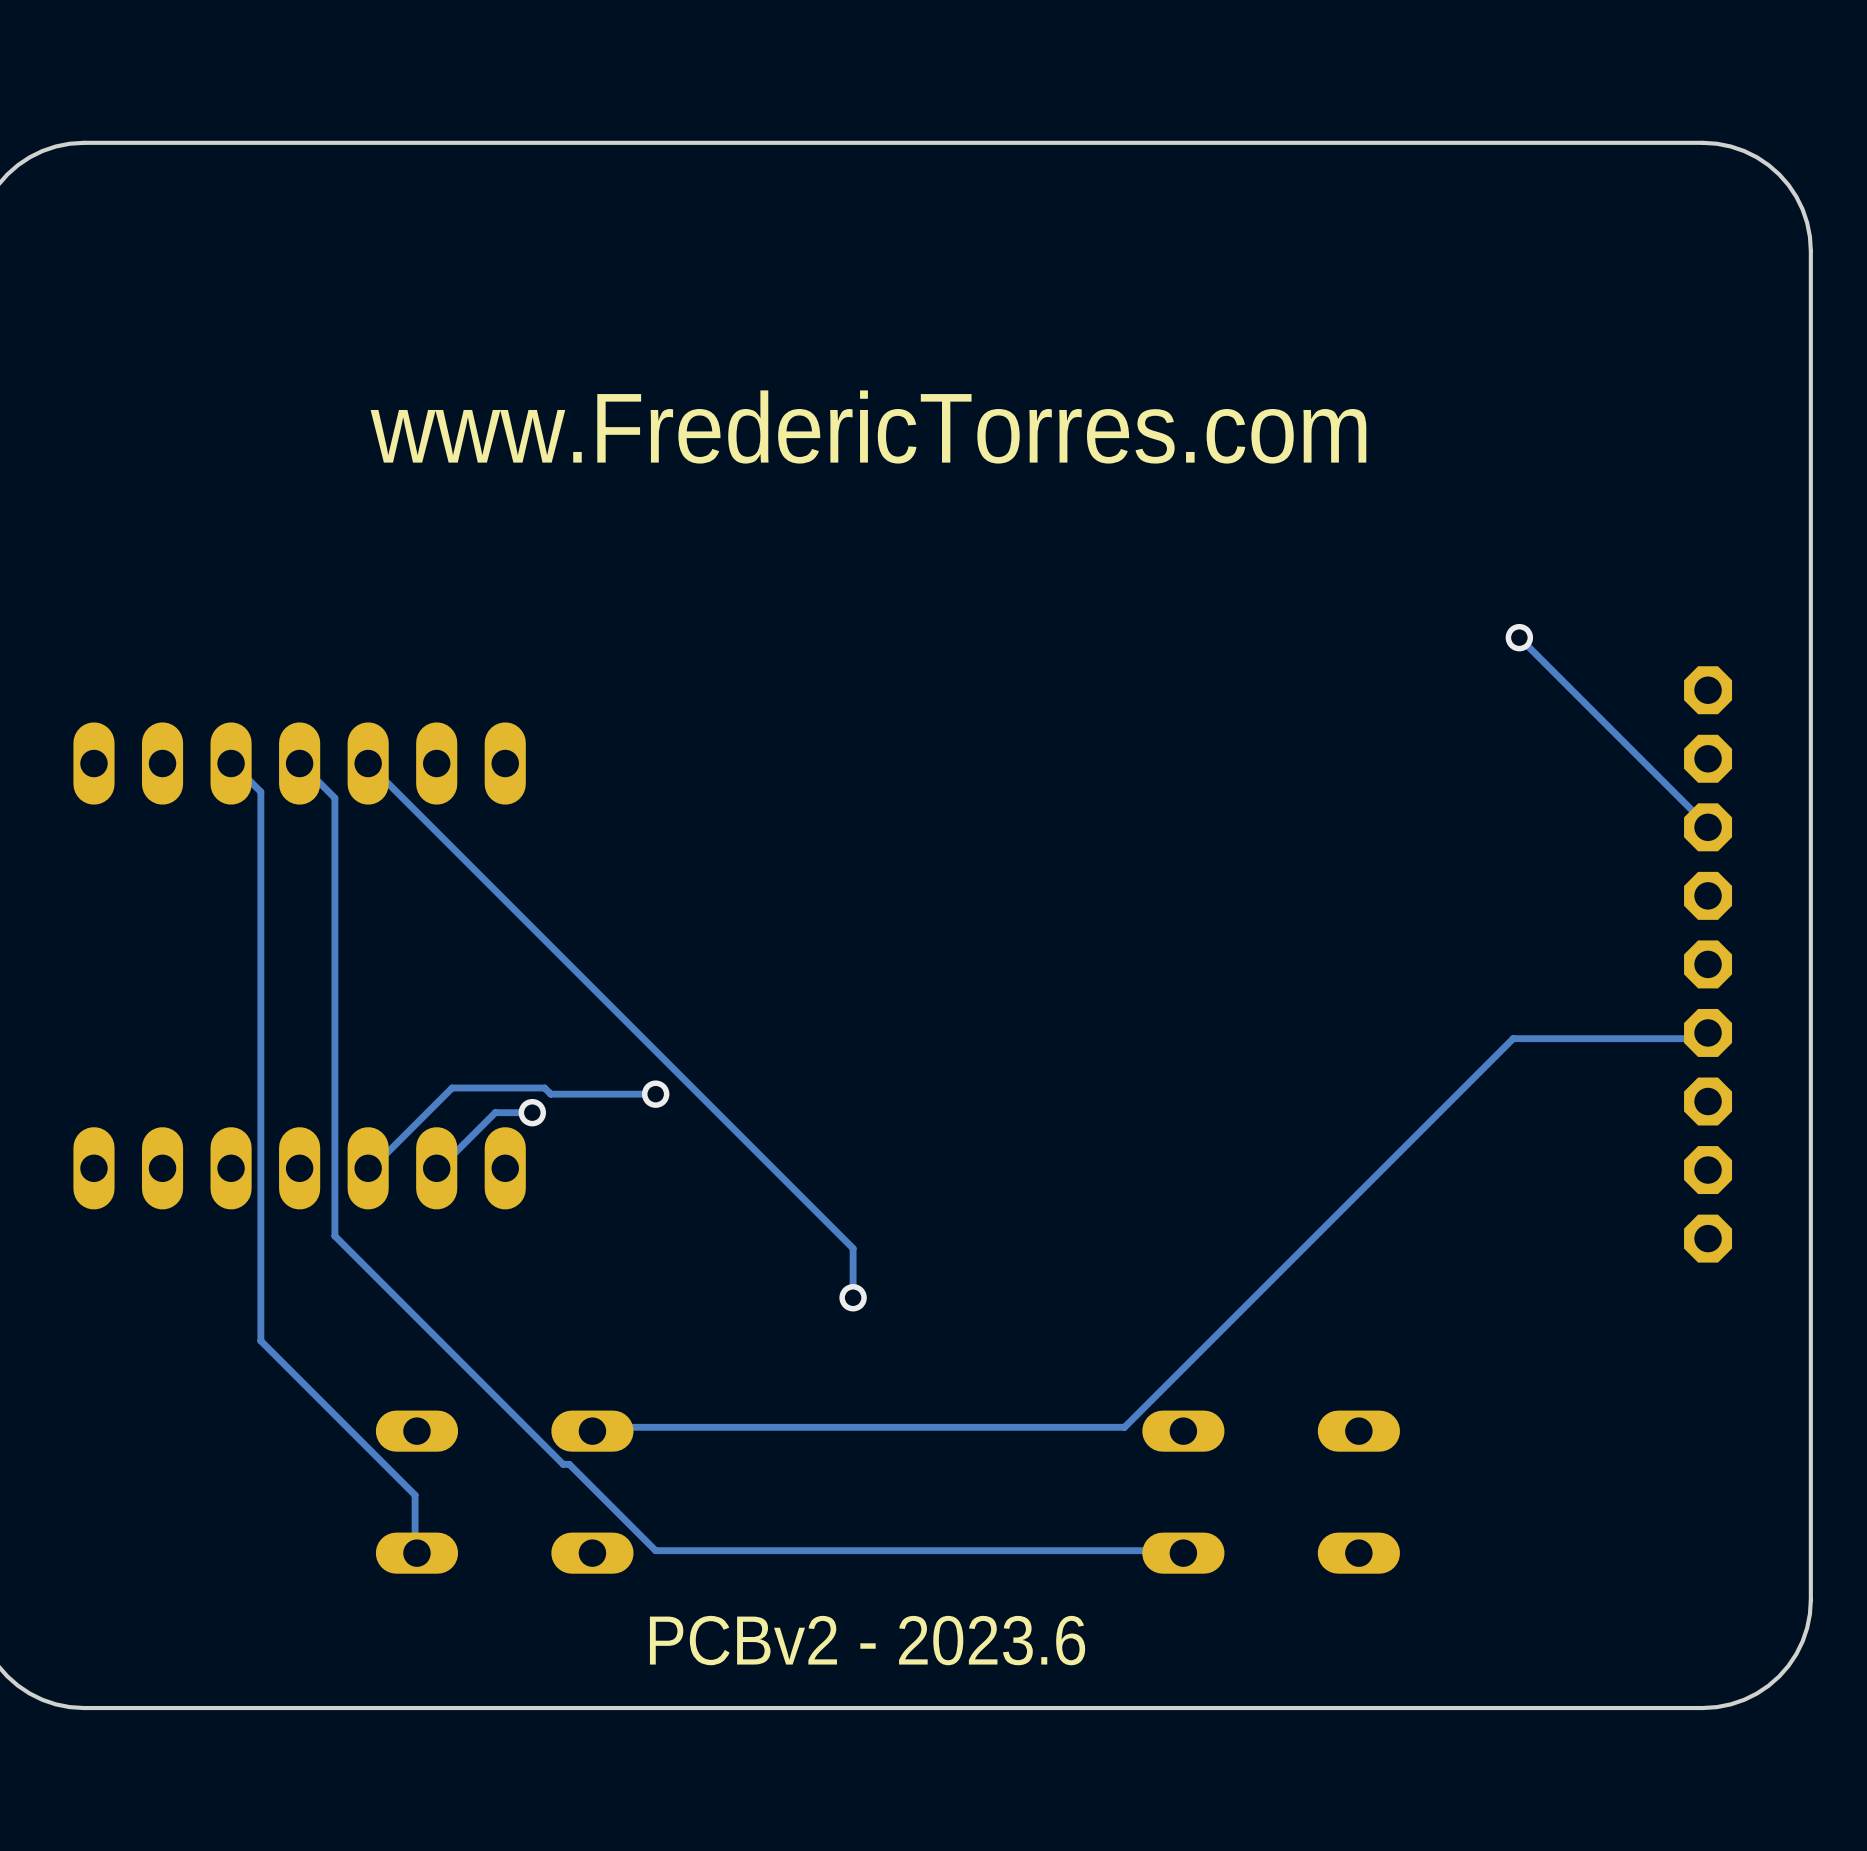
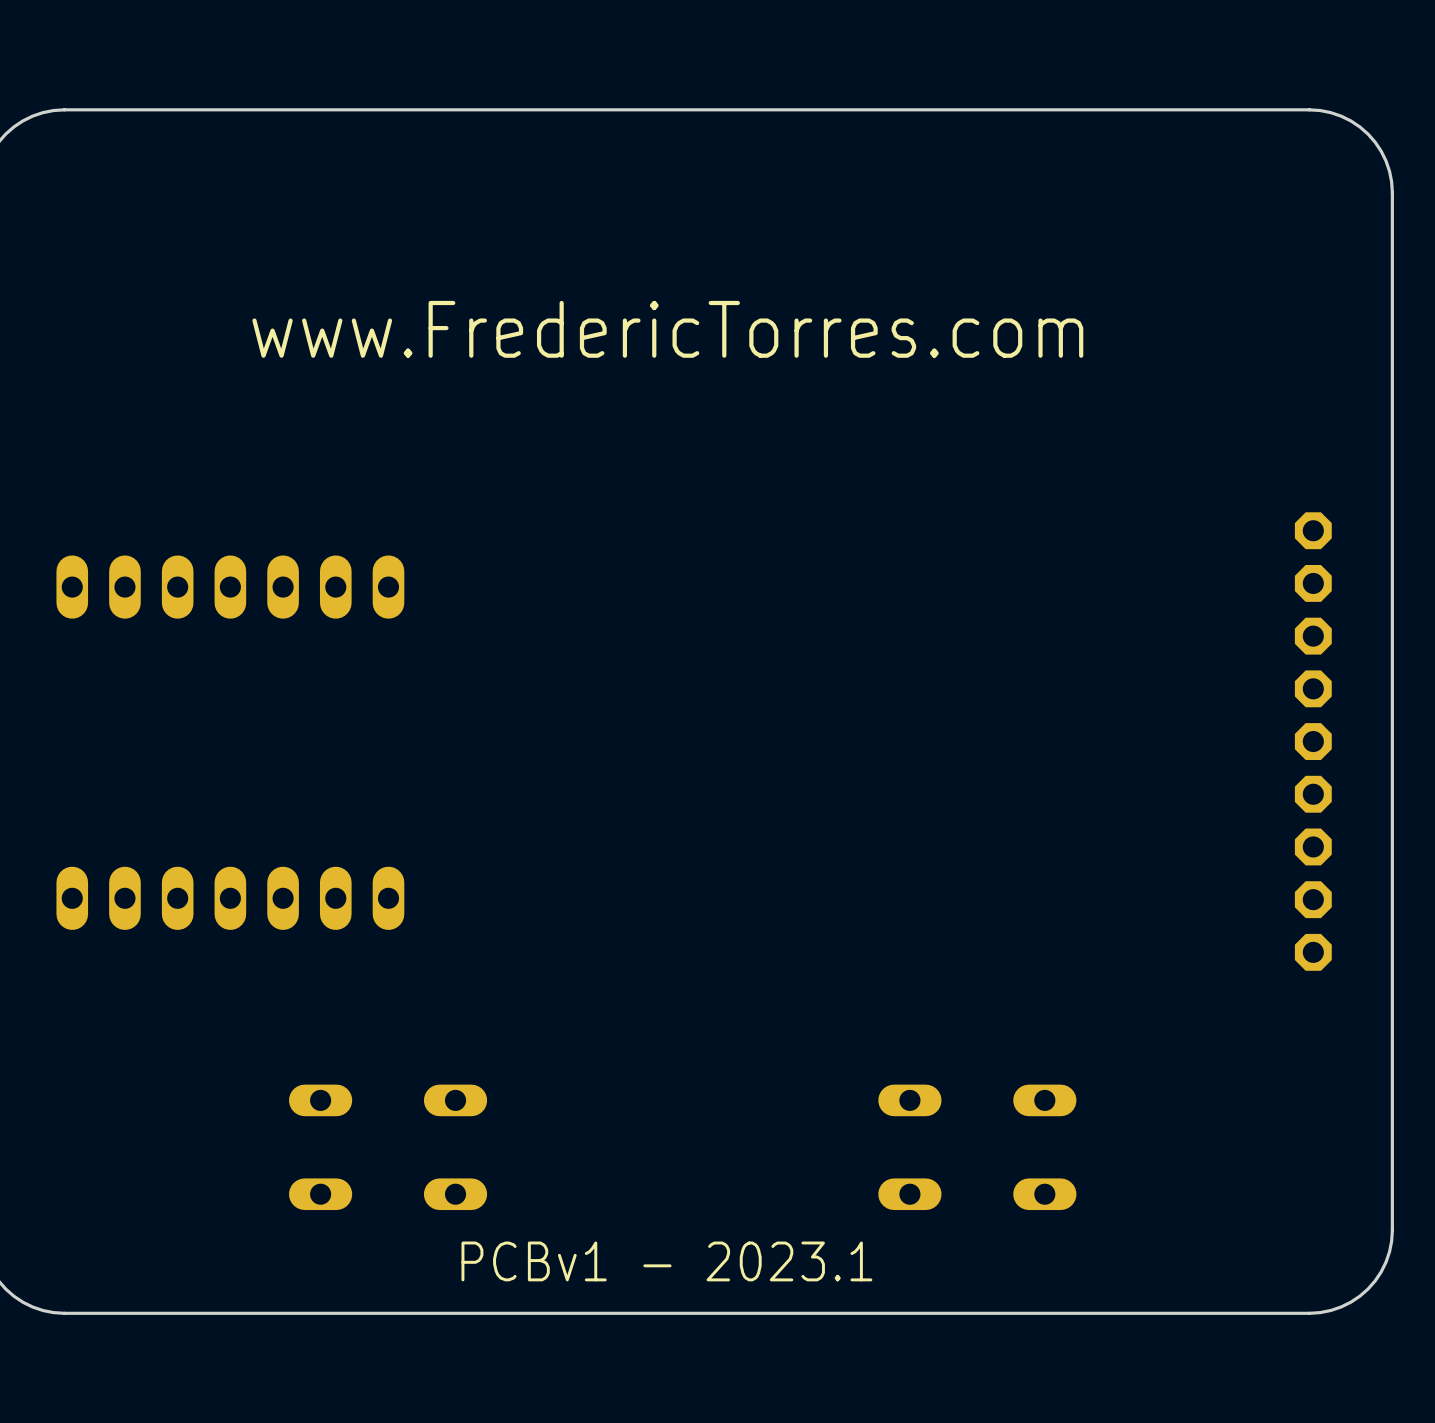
track: (1519, 637) (1708, 827) -> none
via: (1519, 637) -> none
track: (231, 763) (260, 791) (260, 1340) (415, 1495) (415, 1550) (416, 1553) -> none
track: (299, 763) (334, 798) (334, 1236) (563, 1464) (569, 1464) (655, 1550) (1180, 1550) (1183, 1553) -> none
track: (368, 763) (853, 1248) (853, 1297) -> none
track: (1708, 1032) (1704, 1038) (1513, 1038) (1124, 1427) (594, 1427) (592, 1431) -> none
track: (655, 1094) (550, 1094) (544, 1088) (452, 1088) (371, 1168) (368, 1168) -> none
via: (655, 1094) -> none
track: (532, 1112) (495, 1112) (439, 1168) (436, 1168) -> none
via: (532, 1112) -> none
via: (853, 1297) -> none
text: PCBv2 - 2023.6 (867, 1640) -> PCBv1 - 2023.1 (666, 1261)

